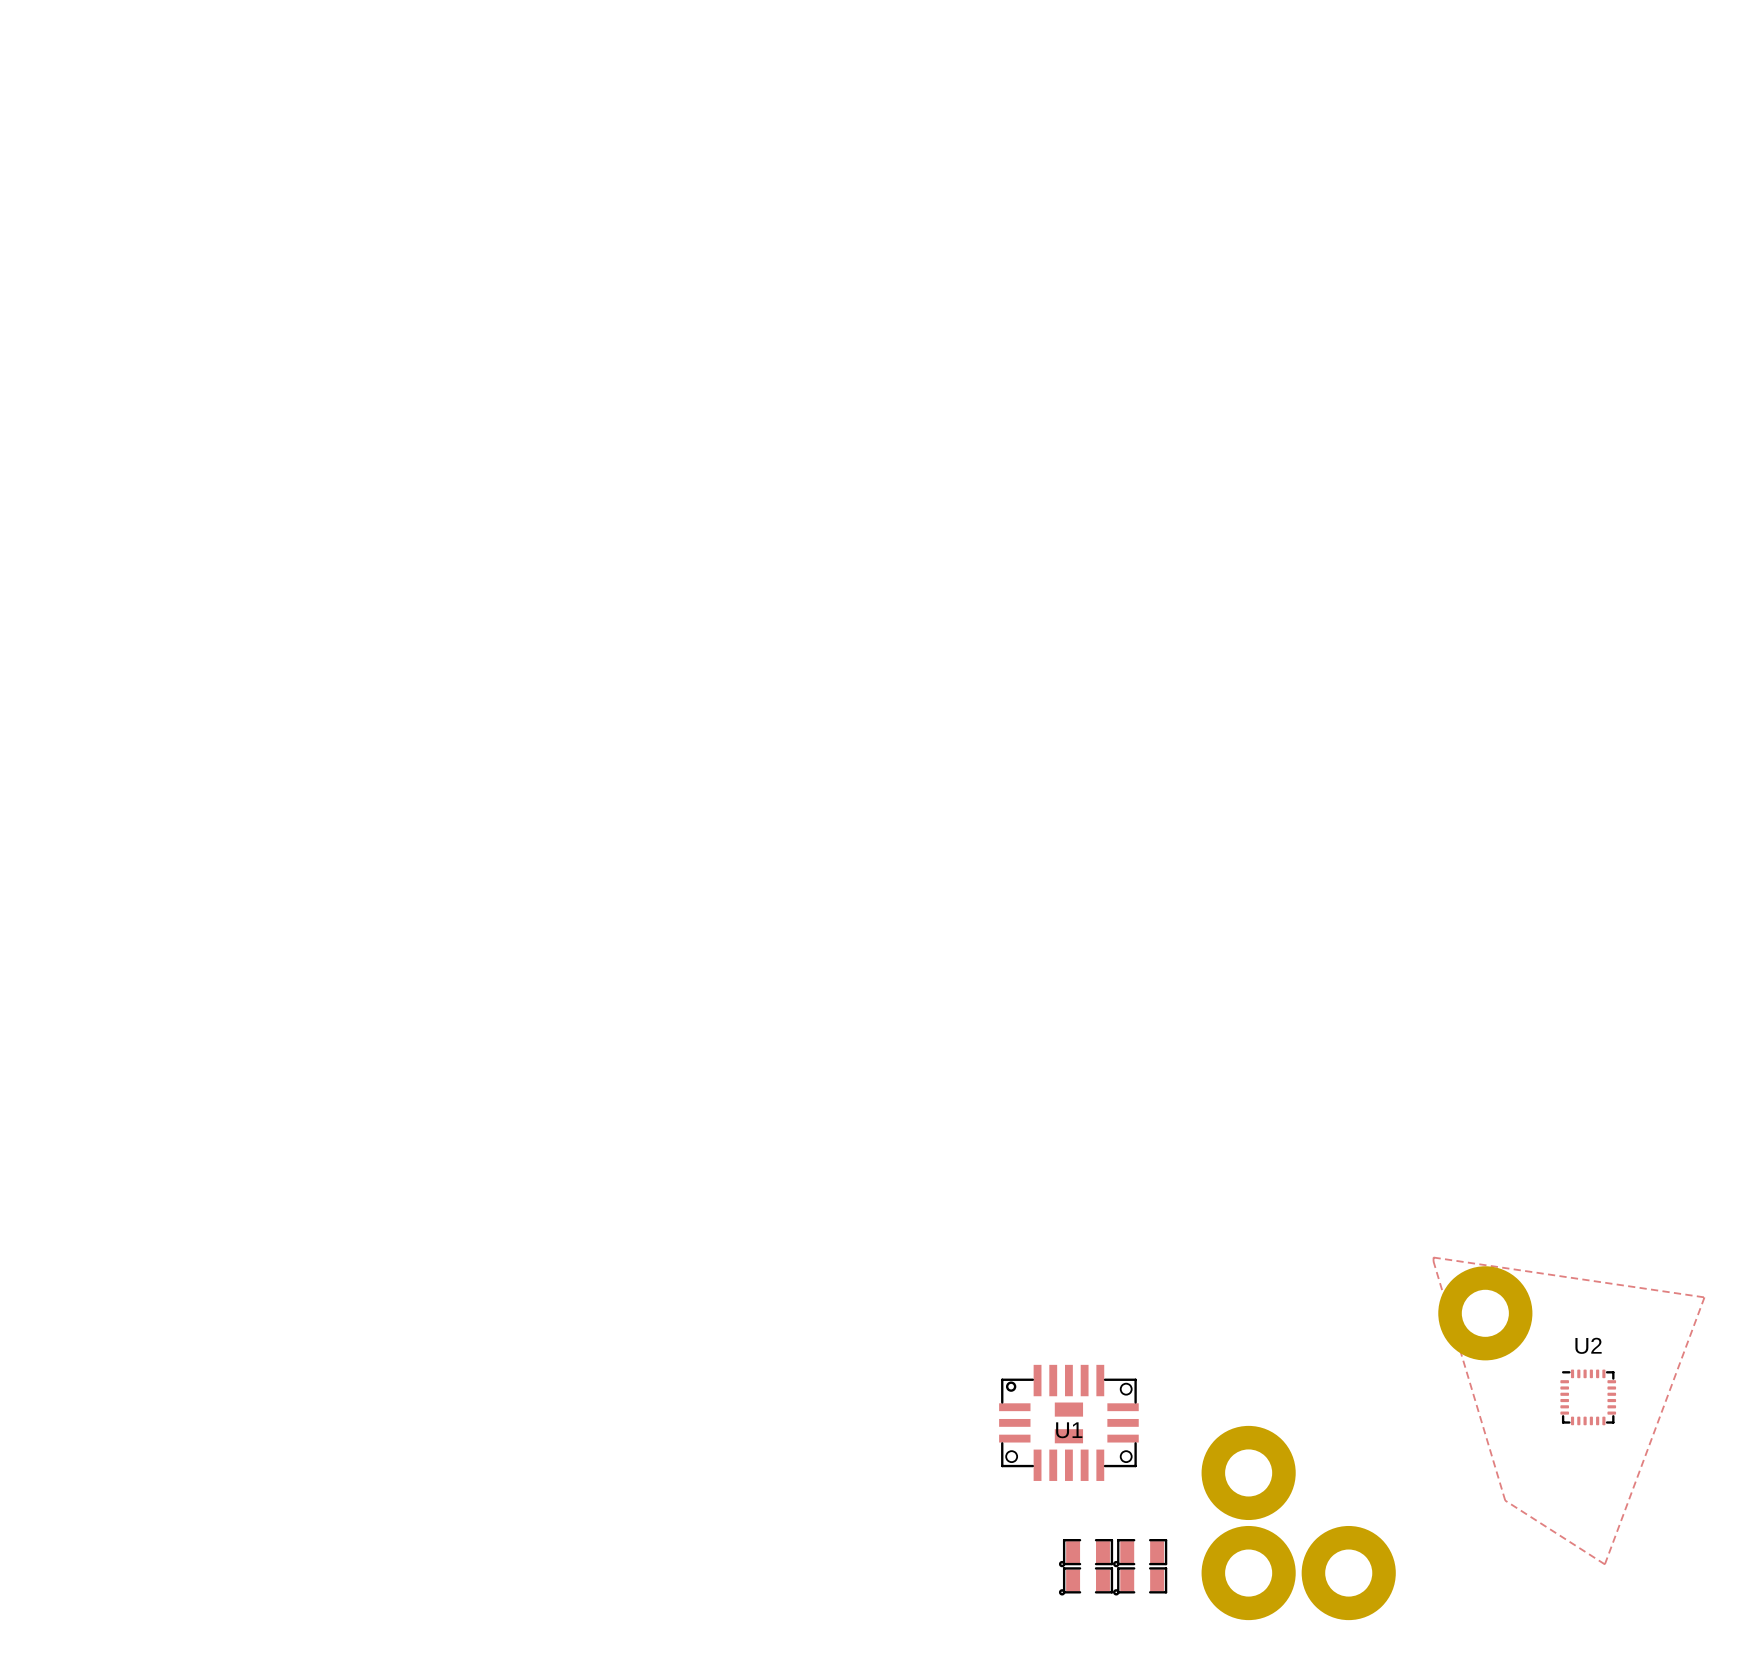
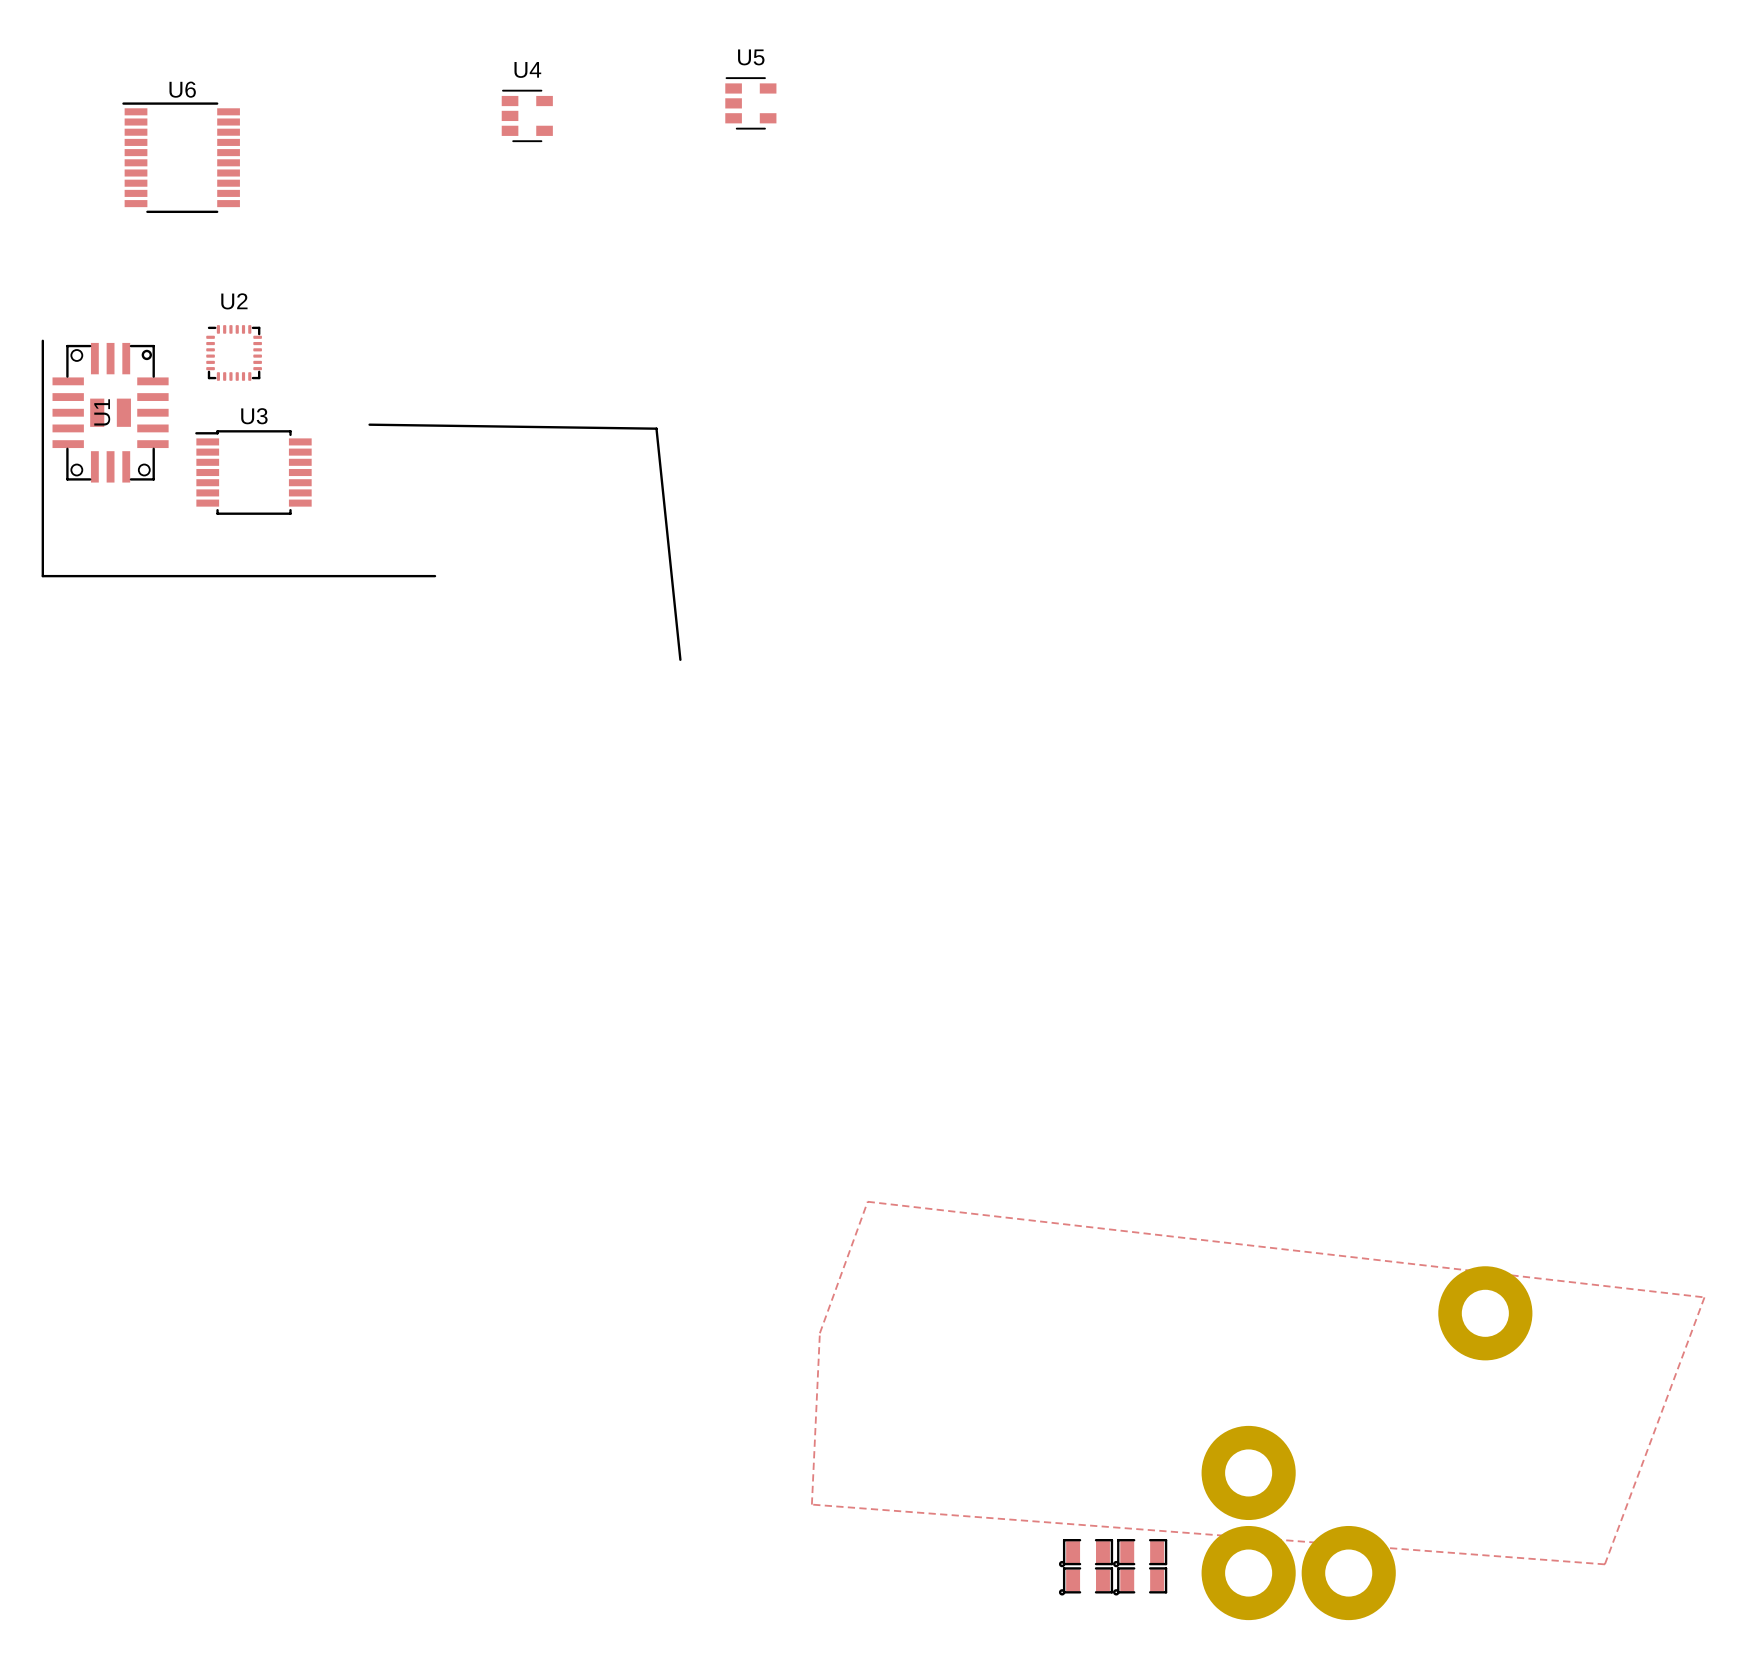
U5: none -> (750, 103)
U4: none -> (527, 115)
U6: none -> (181, 157)
board edge: none -> (42, 340) (42, 576) (435, 576)
board edge: none -> (369, 424) (656, 428) (680, 659)
U3: none -> (253, 472)
zone outline: (1704, 1297) (1433, 1257) (1505, 1500) (1604, 1564) -> (1704, 1297) (867, 1201) (819, 1333) (811, 1504) (1604, 1564)
U2 position: (1588, 1397) -> (234, 352)
U1 rotation: 0° (1068, 1422) -> 90° clockwise (110, 412)
U1 position: (1068, 1422) -> (110, 412)

